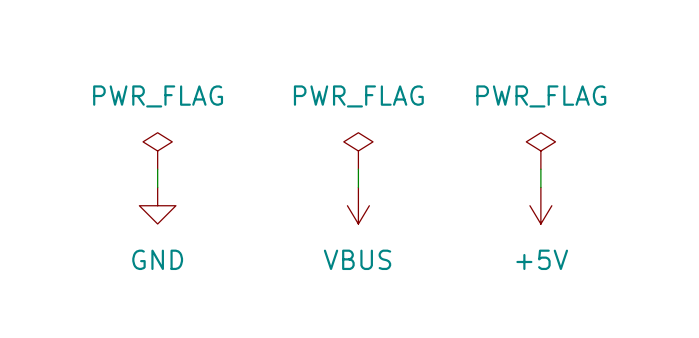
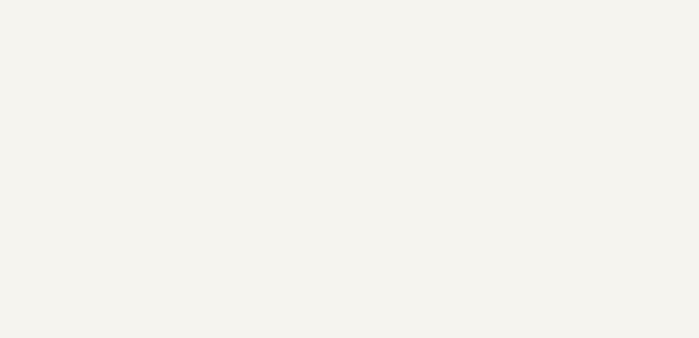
power symbol: PWR_FLAG (157, 151) -> none
power symbol: PWR_FLAG (358, 151) -> none
power symbol: PWR_FLAG (540, 151) -> none
wire: (157, 169) (157, 187) -> none
wire: (358, 169) (358, 187) -> none
wire: (540, 169) (540, 187) -> none
power symbol: GND (157, 205) -> none
power symbol: VBUS (358, 205) -> none
power symbol: +5V (540, 205) -> none

